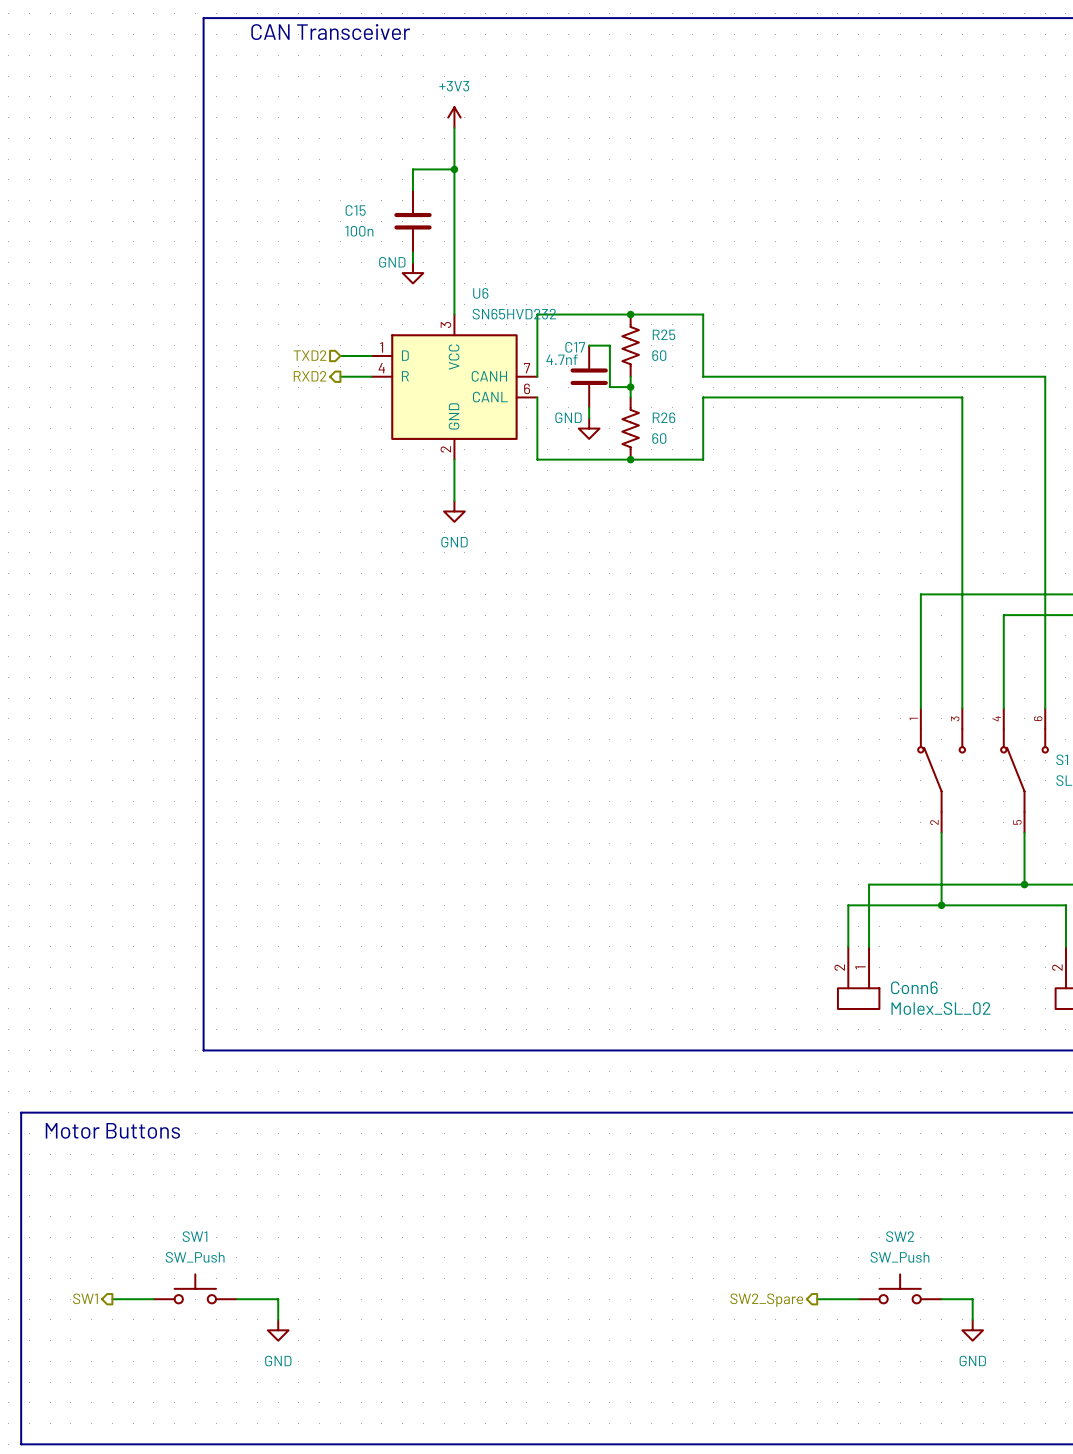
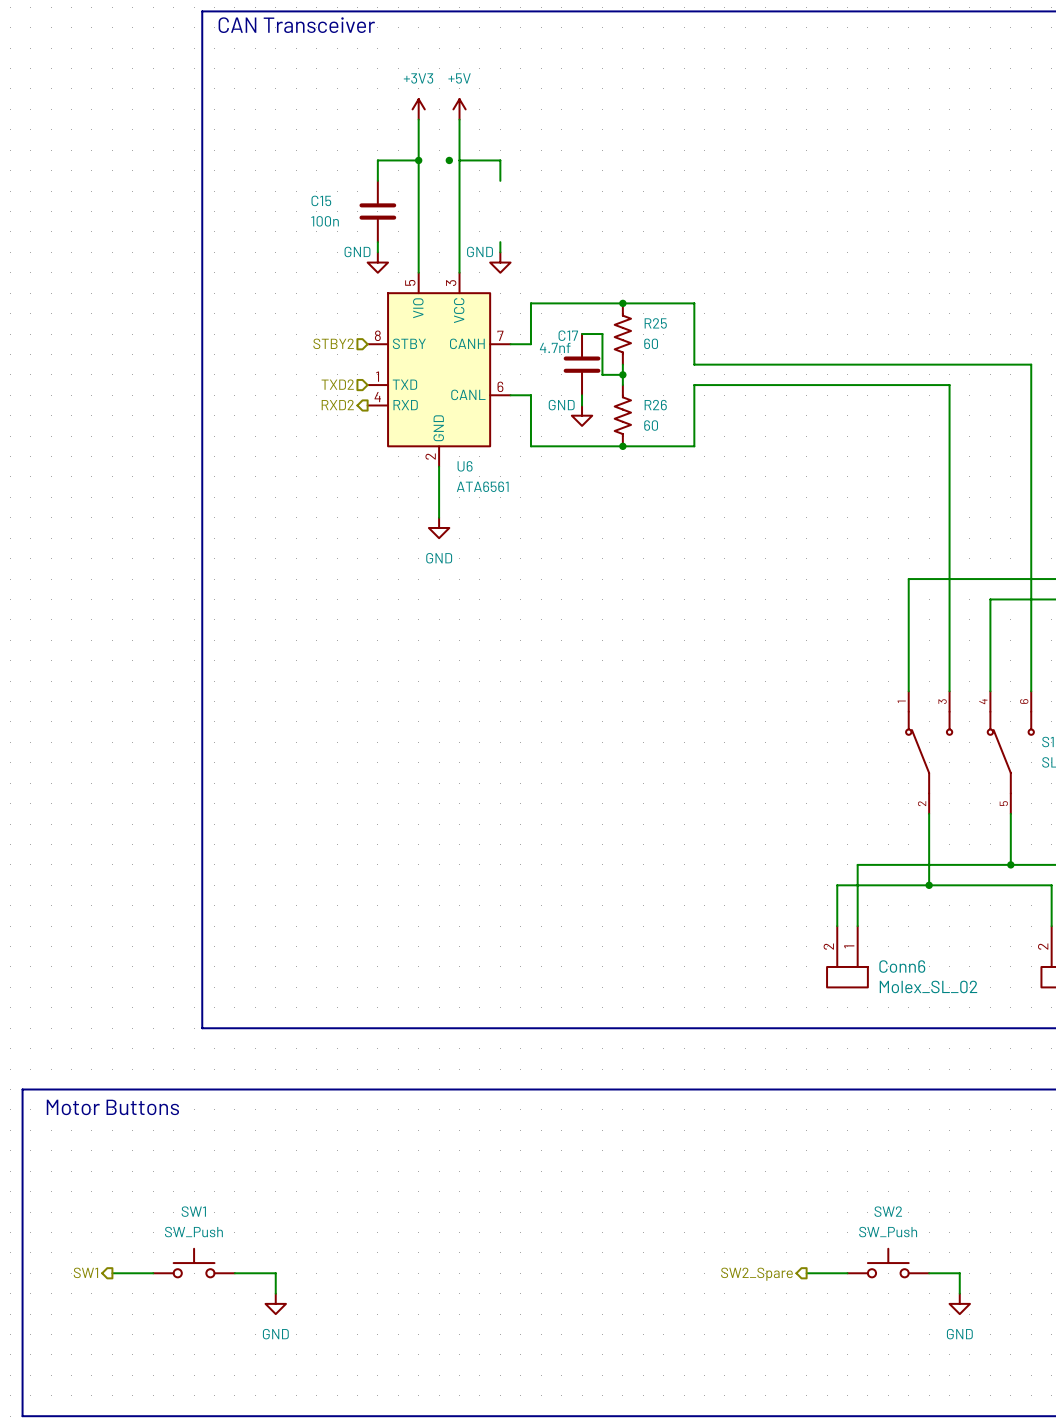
text position: CAN Transceiver (330, 32) -> CAN Transceiver (296, 25)
power symbol position: +3V3 (454, 117) -> +3V3 (418, 109)
power symbol: none -> +5V (459, 109)
wire: none -> (418, 119) (418, 272)
wire: (454, 127) (454, 314) -> none
wire: none -> (459, 119) (459, 272)
wire: (412, 169) (412, 190) -> (408, 160) (377, 160) (377, 180)
wire: (423, 169) (454, 169) -> none
junction: none -> (418, 160)
wire: none -> (459, 160) (500, 160) (500, 180)
C15 position: (412, 221) -> (377, 211)
wire: (412, 252) (412, 262) -> (377, 242) (377, 252)
wire: none -> (500, 242) (500, 252)
power symbol position: GND (412, 273) -> GND (377, 262)
power symbol: none -> GND (500, 262)
U6 name position: U6 (480, 293) -> U6 (465, 466)
U6 symbol: [371, 314, 538, 460] -> [367, 272, 511, 467]
U6 value: SN65HVD232 (514, 314) -> ATA6561 (482, 486)
hierarchical label position: TXD2 (310, 355) -> TXD2 (337, 384)
hierarchical label: none -> STBY2 (333, 343)
wire: (340, 355) (371, 355) -> none
wire: (537, 355) (537, 376) -> (530, 344) (510, 344)
hierarchical label position: RXD2 (310, 376) -> RXD2 (337, 405)
wire: (340, 376) (371, 376) -> none
wire: (537, 397) (537, 407) -> (510, 395) (530, 395)
wire: (454, 459) (454, 501) -> none
wire: none -> (439, 466) (439, 517)
power symbol position: GND (454, 511) -> GND (439, 527)

